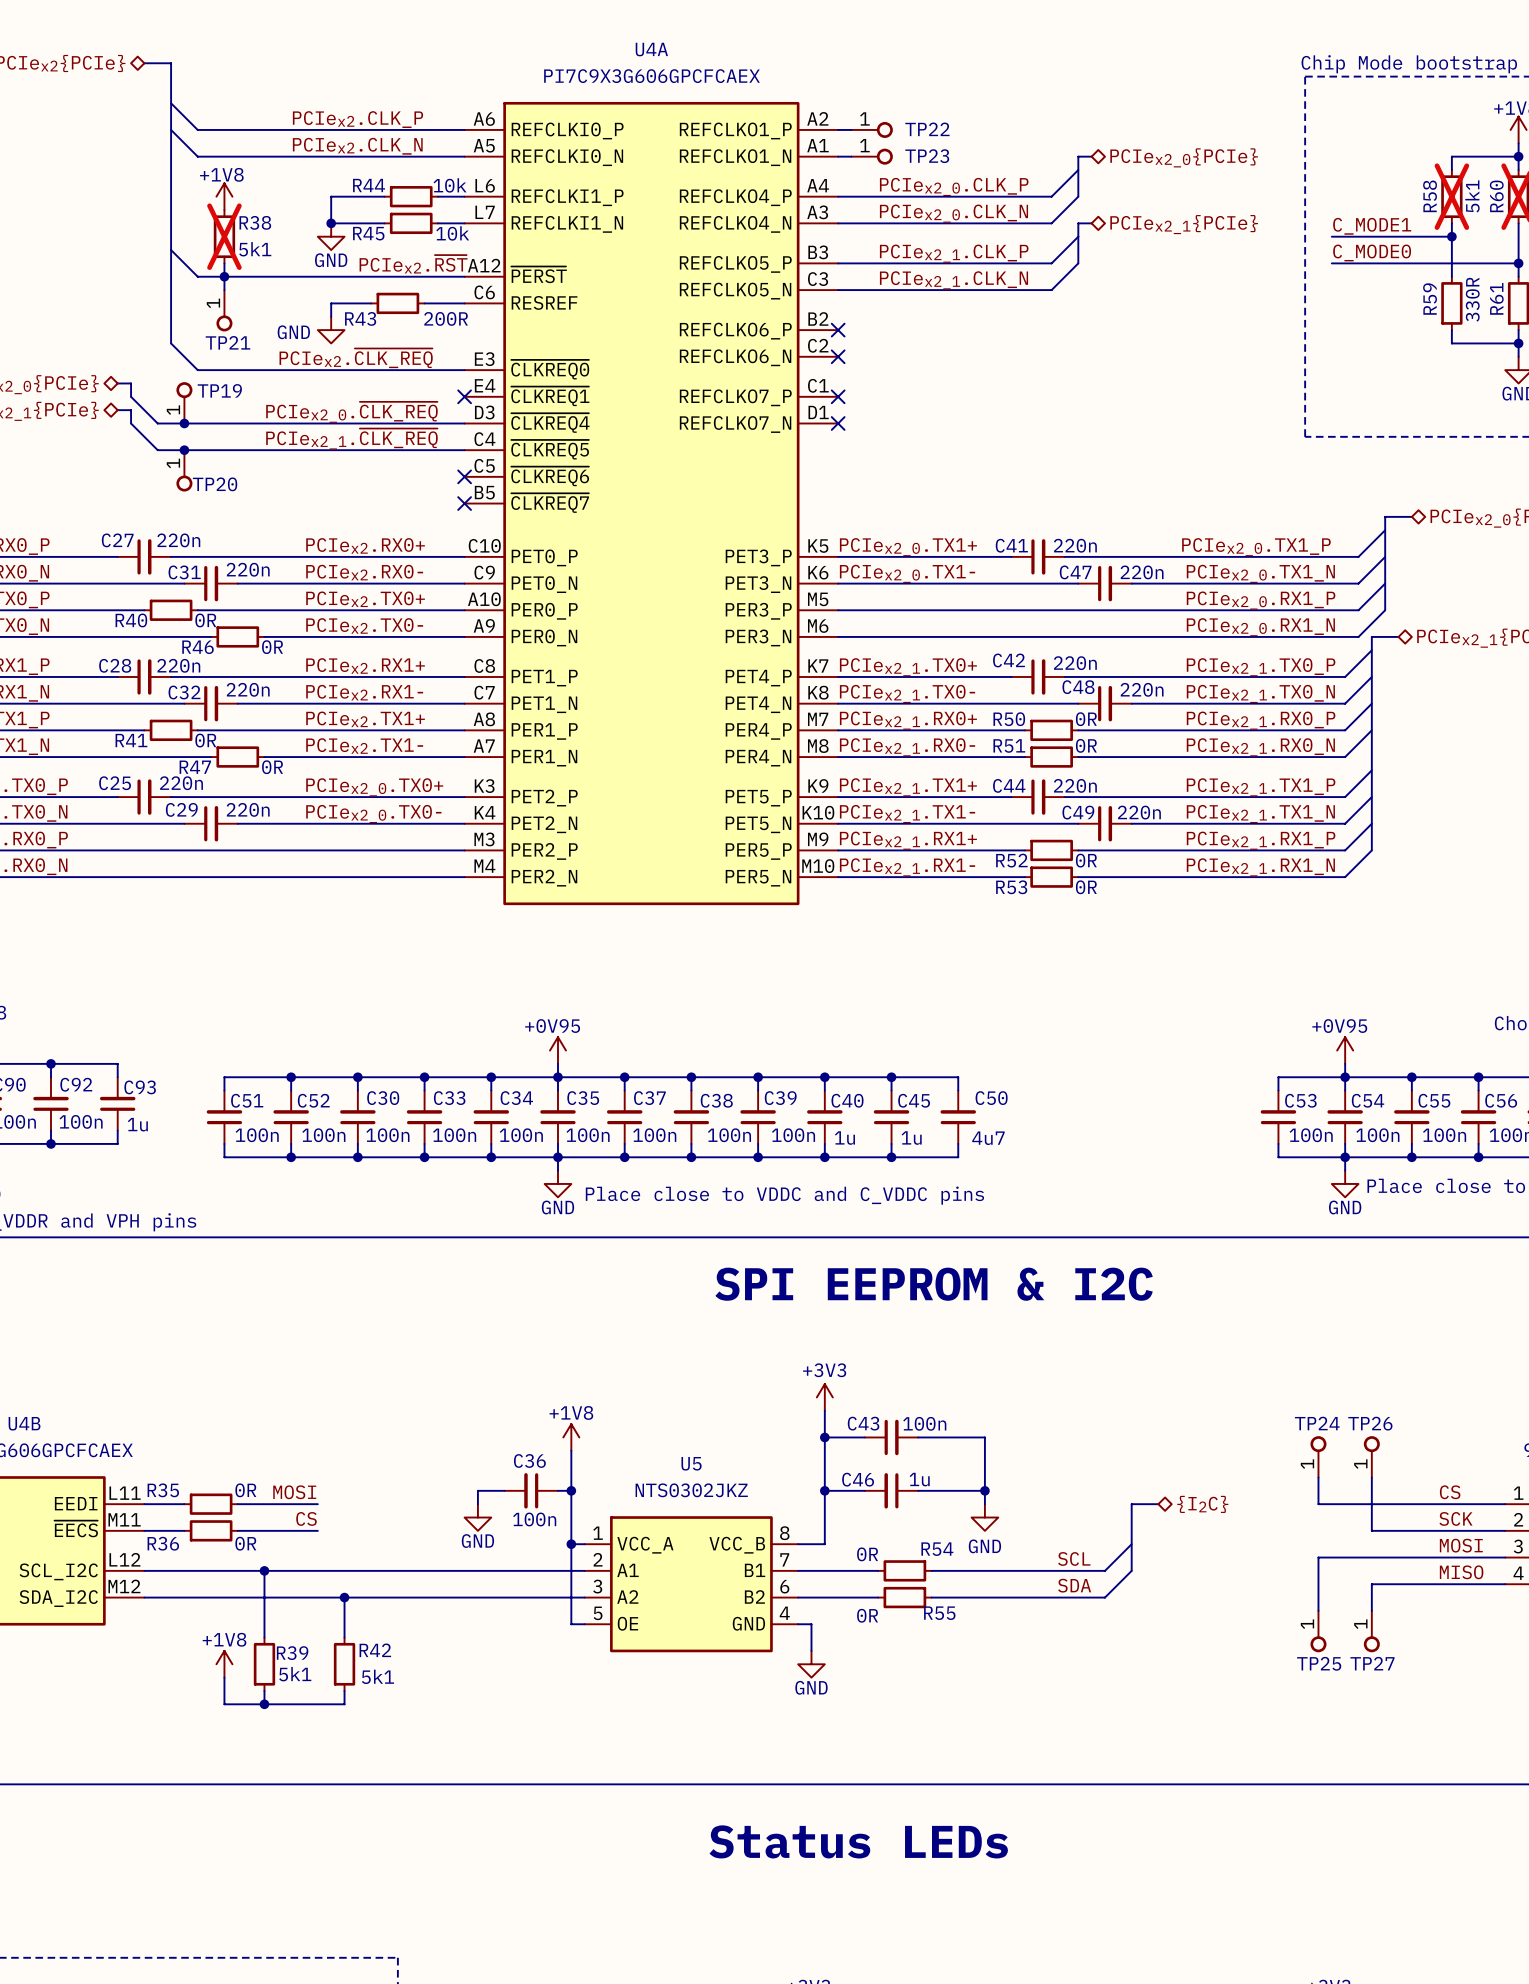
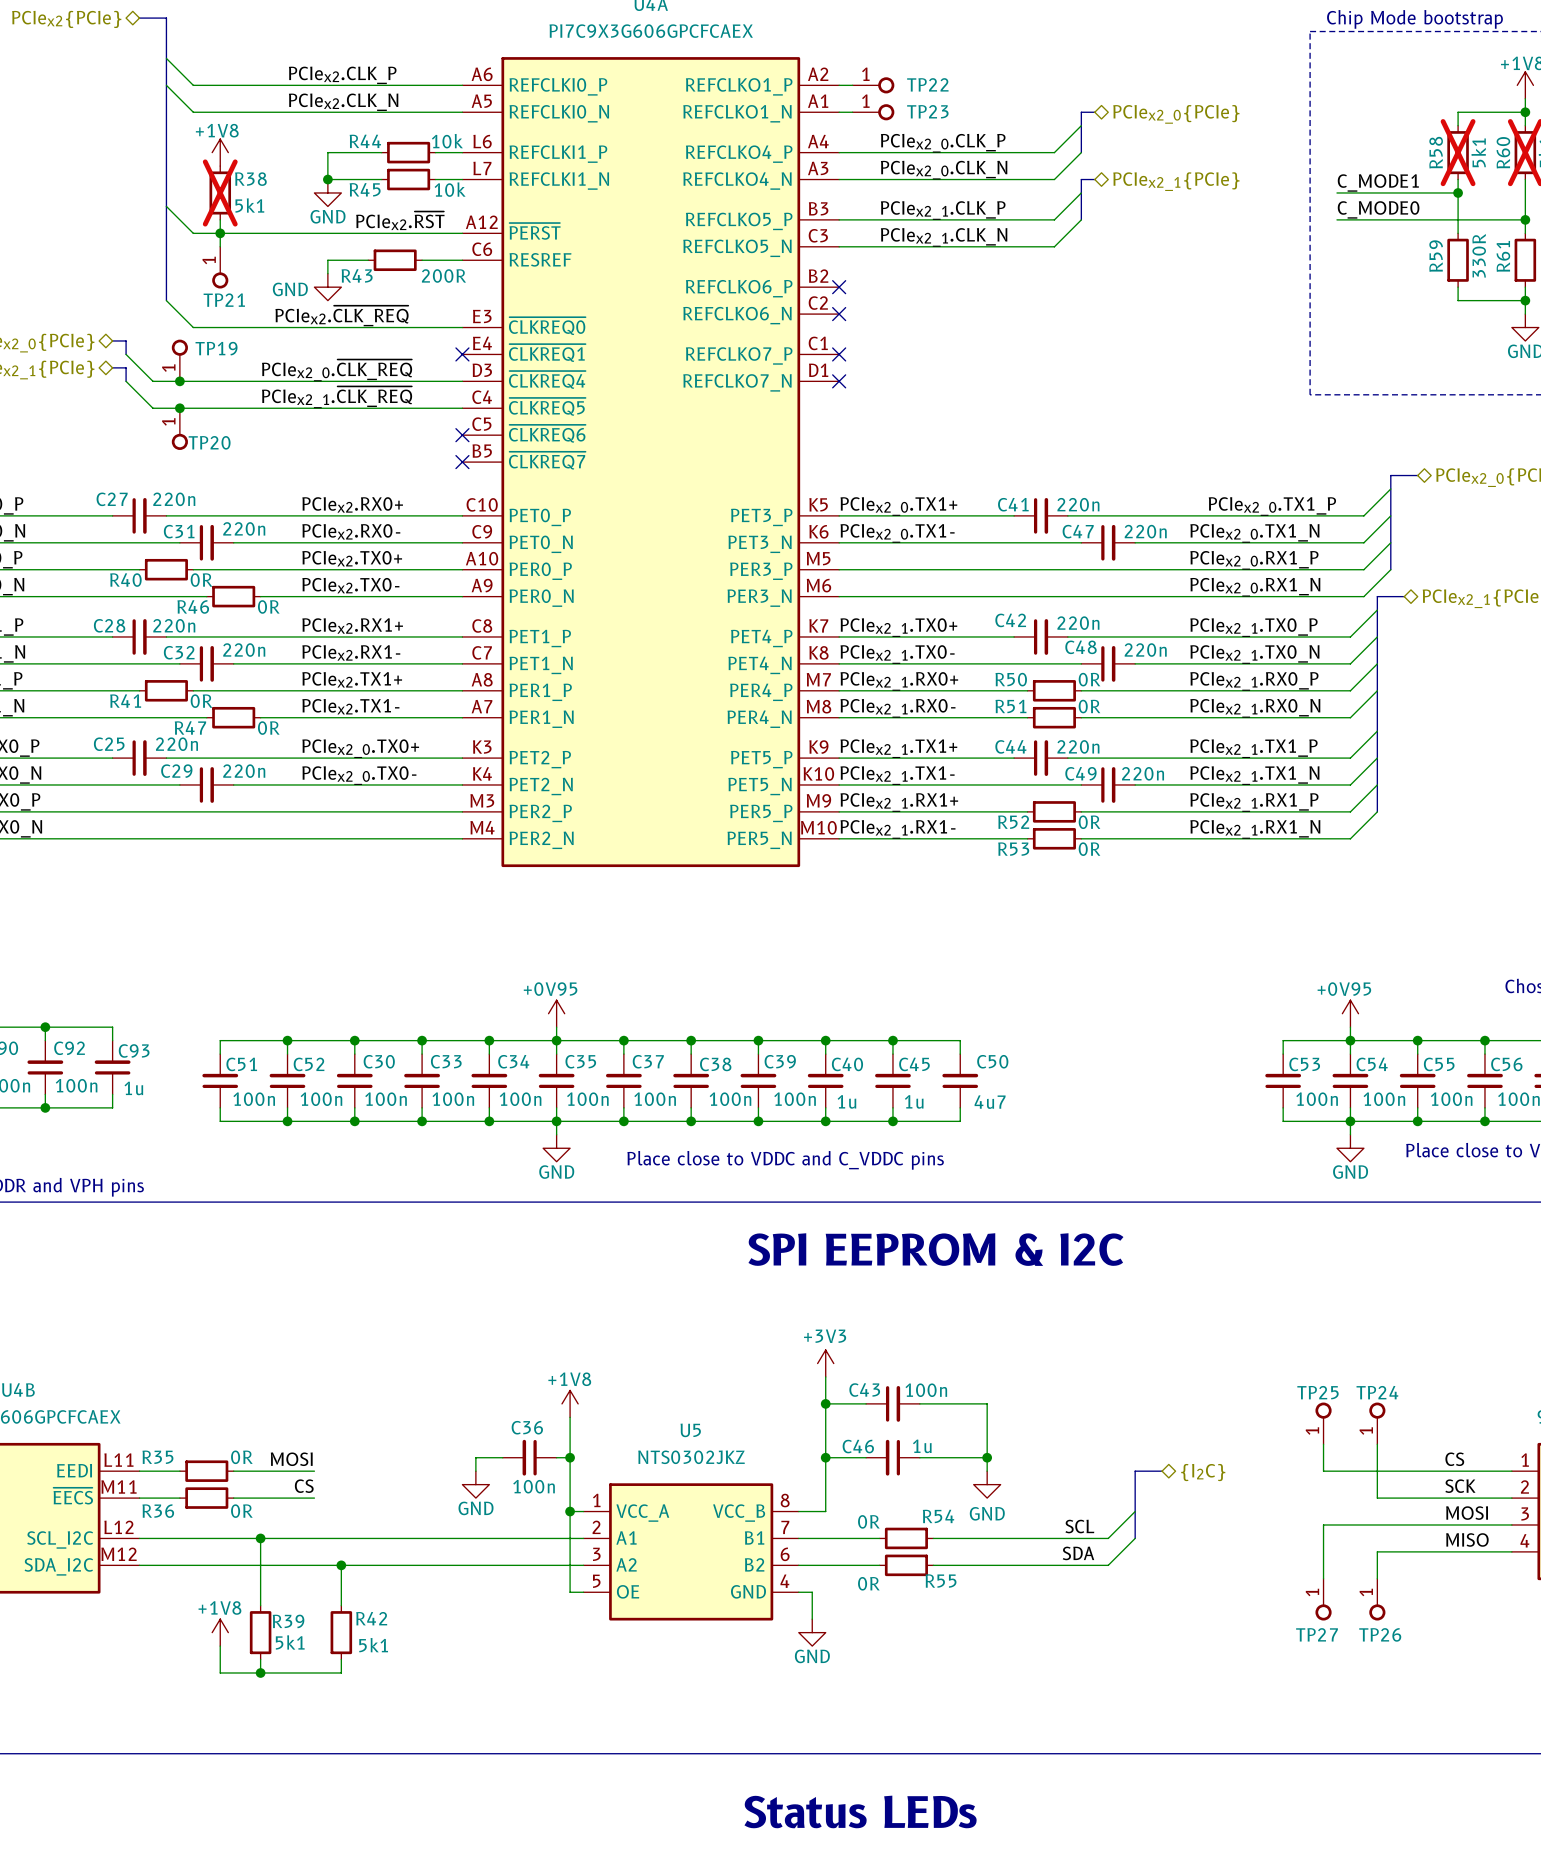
TP24 name: TP24 (1317, 1423) -> TP25 (1317, 1392)
TP26 name: TP26 (1370, 1423) -> TP24 (1377, 1392)
TP25 name: TP25 (1319, 1663) -> TP27 (1317, 1634)
TP27 name: TP27 (1372, 1663) -> TP26 (1380, 1634)

